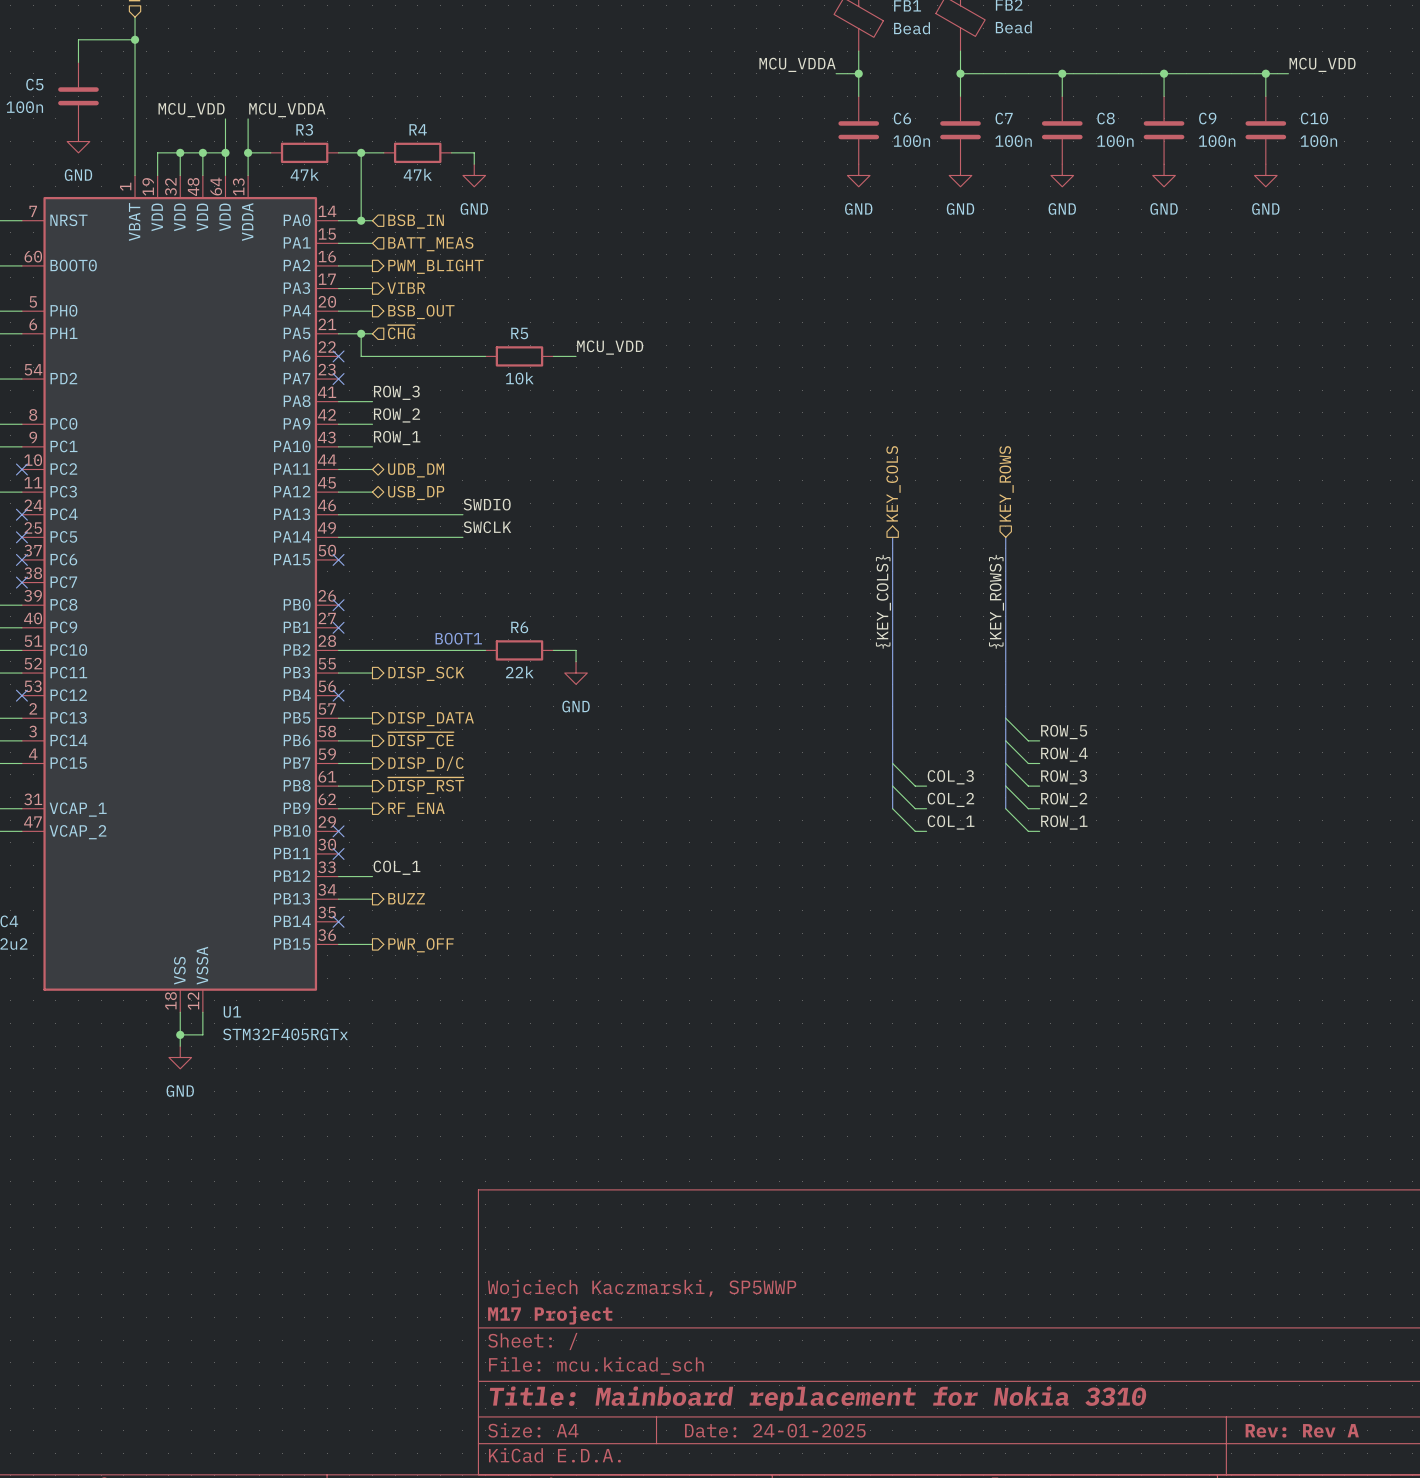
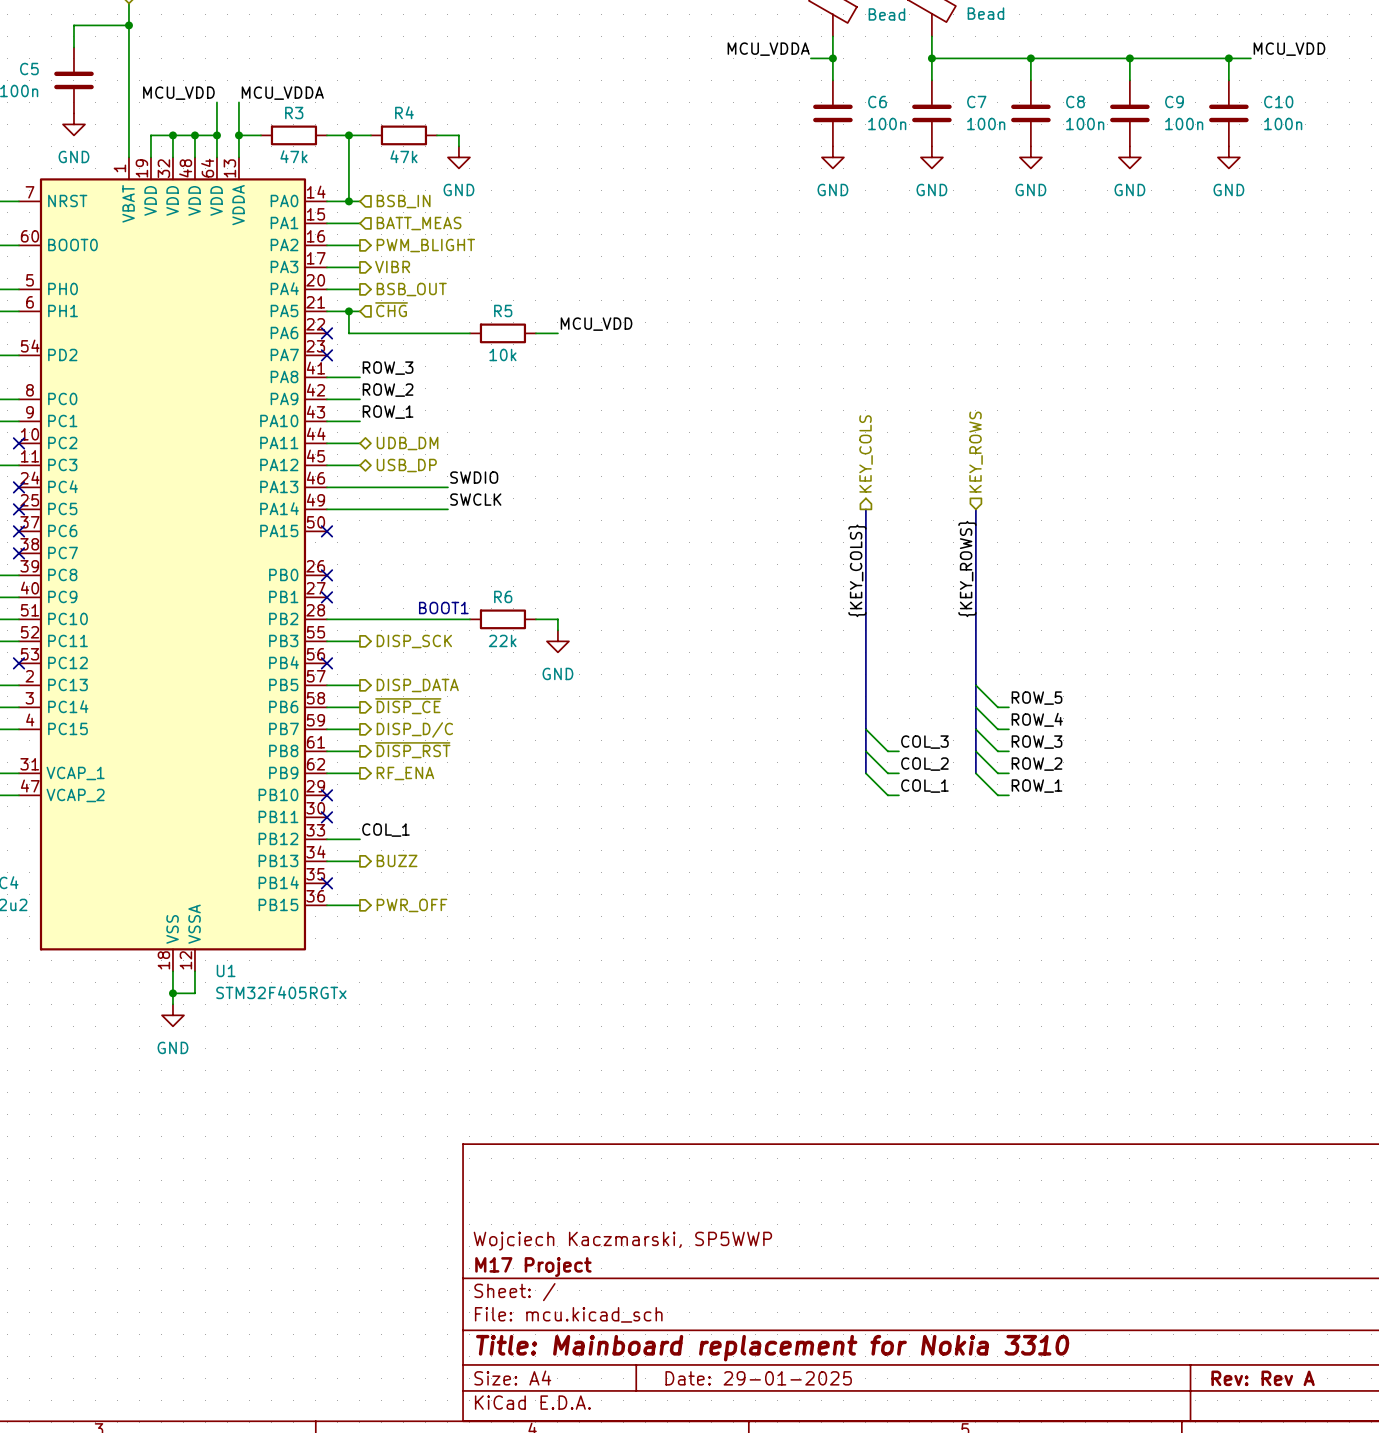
title block: Date: 24-01-2025 (775, 1430) -> Date: 29-01-2025 (758, 1378)

